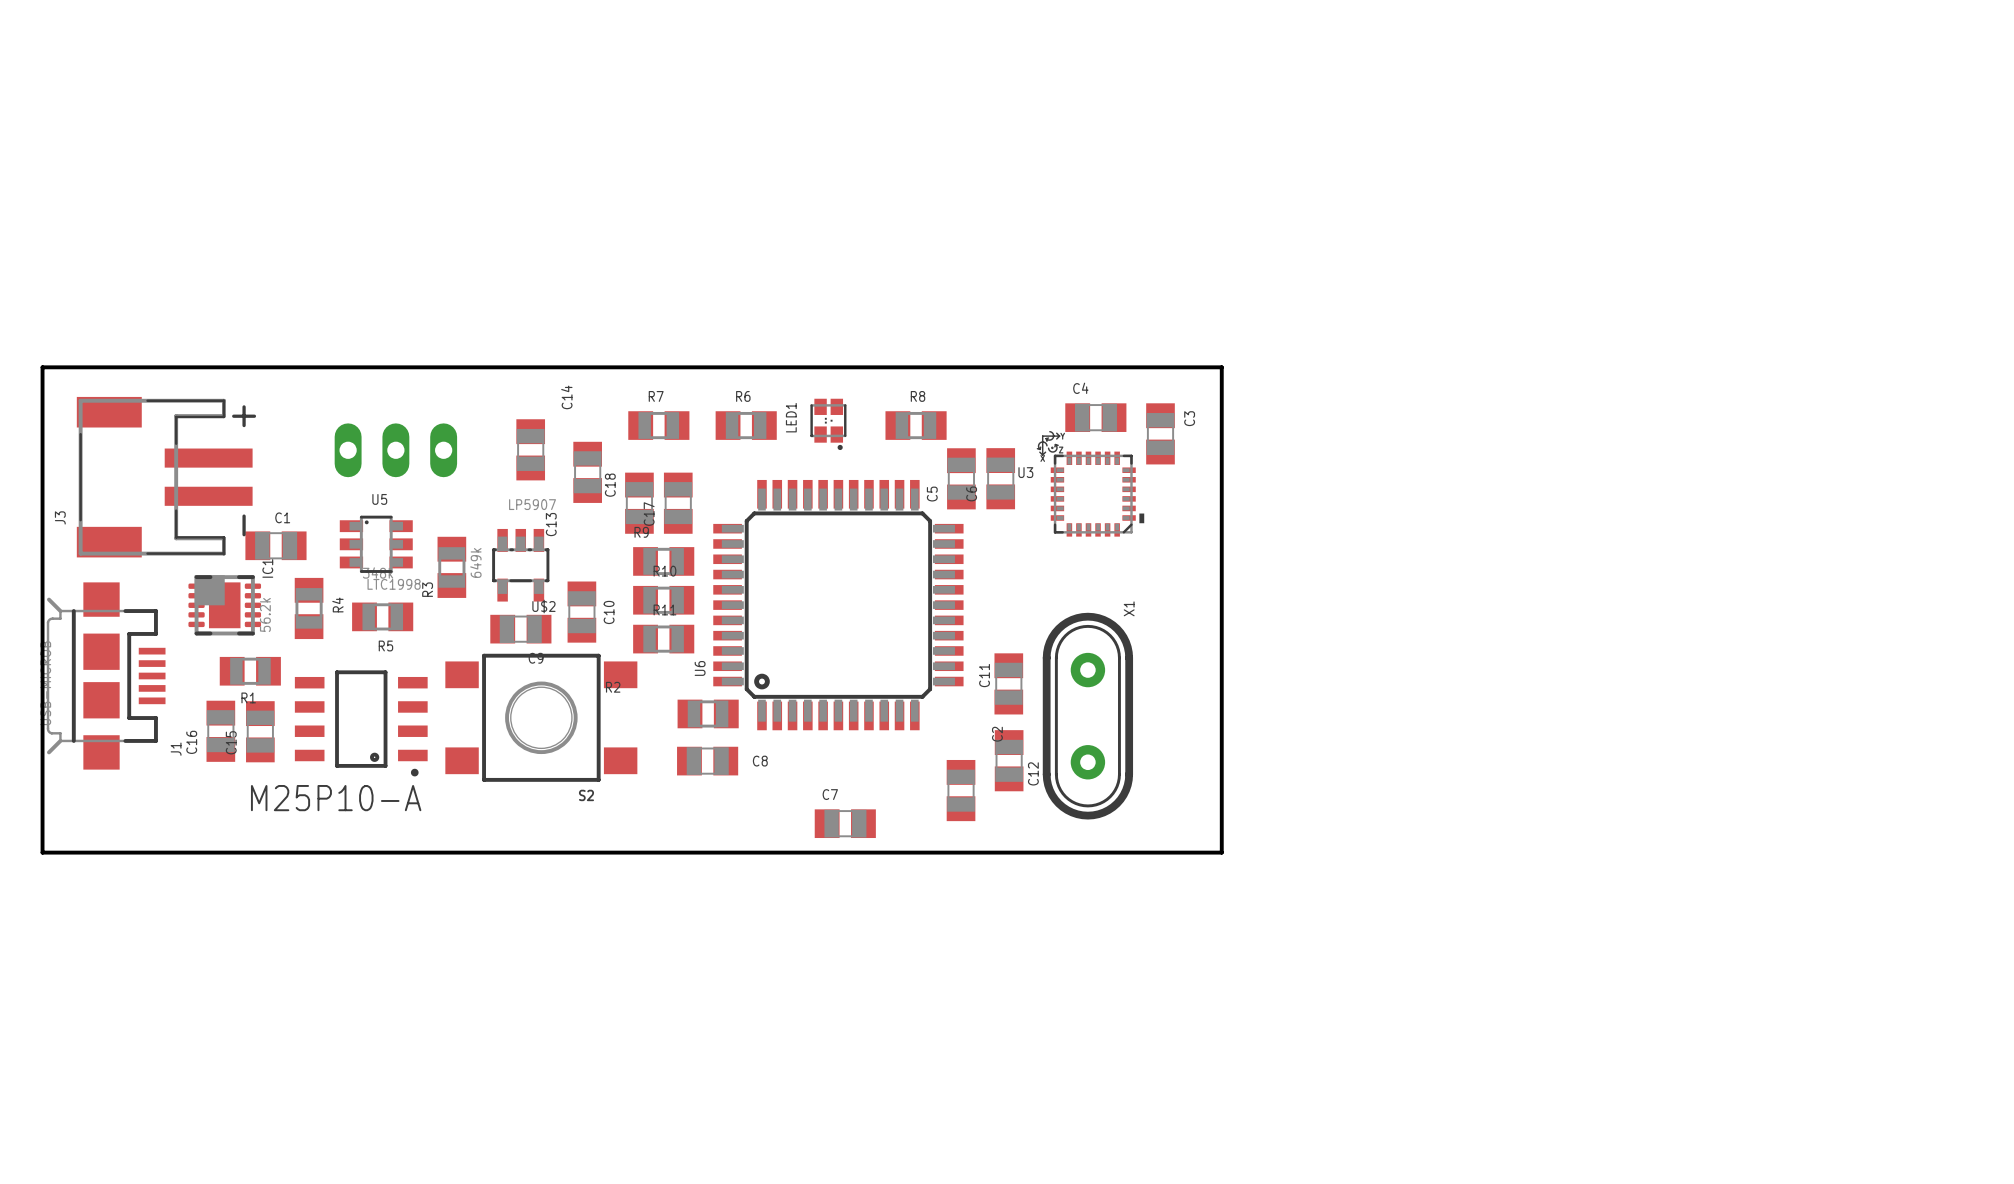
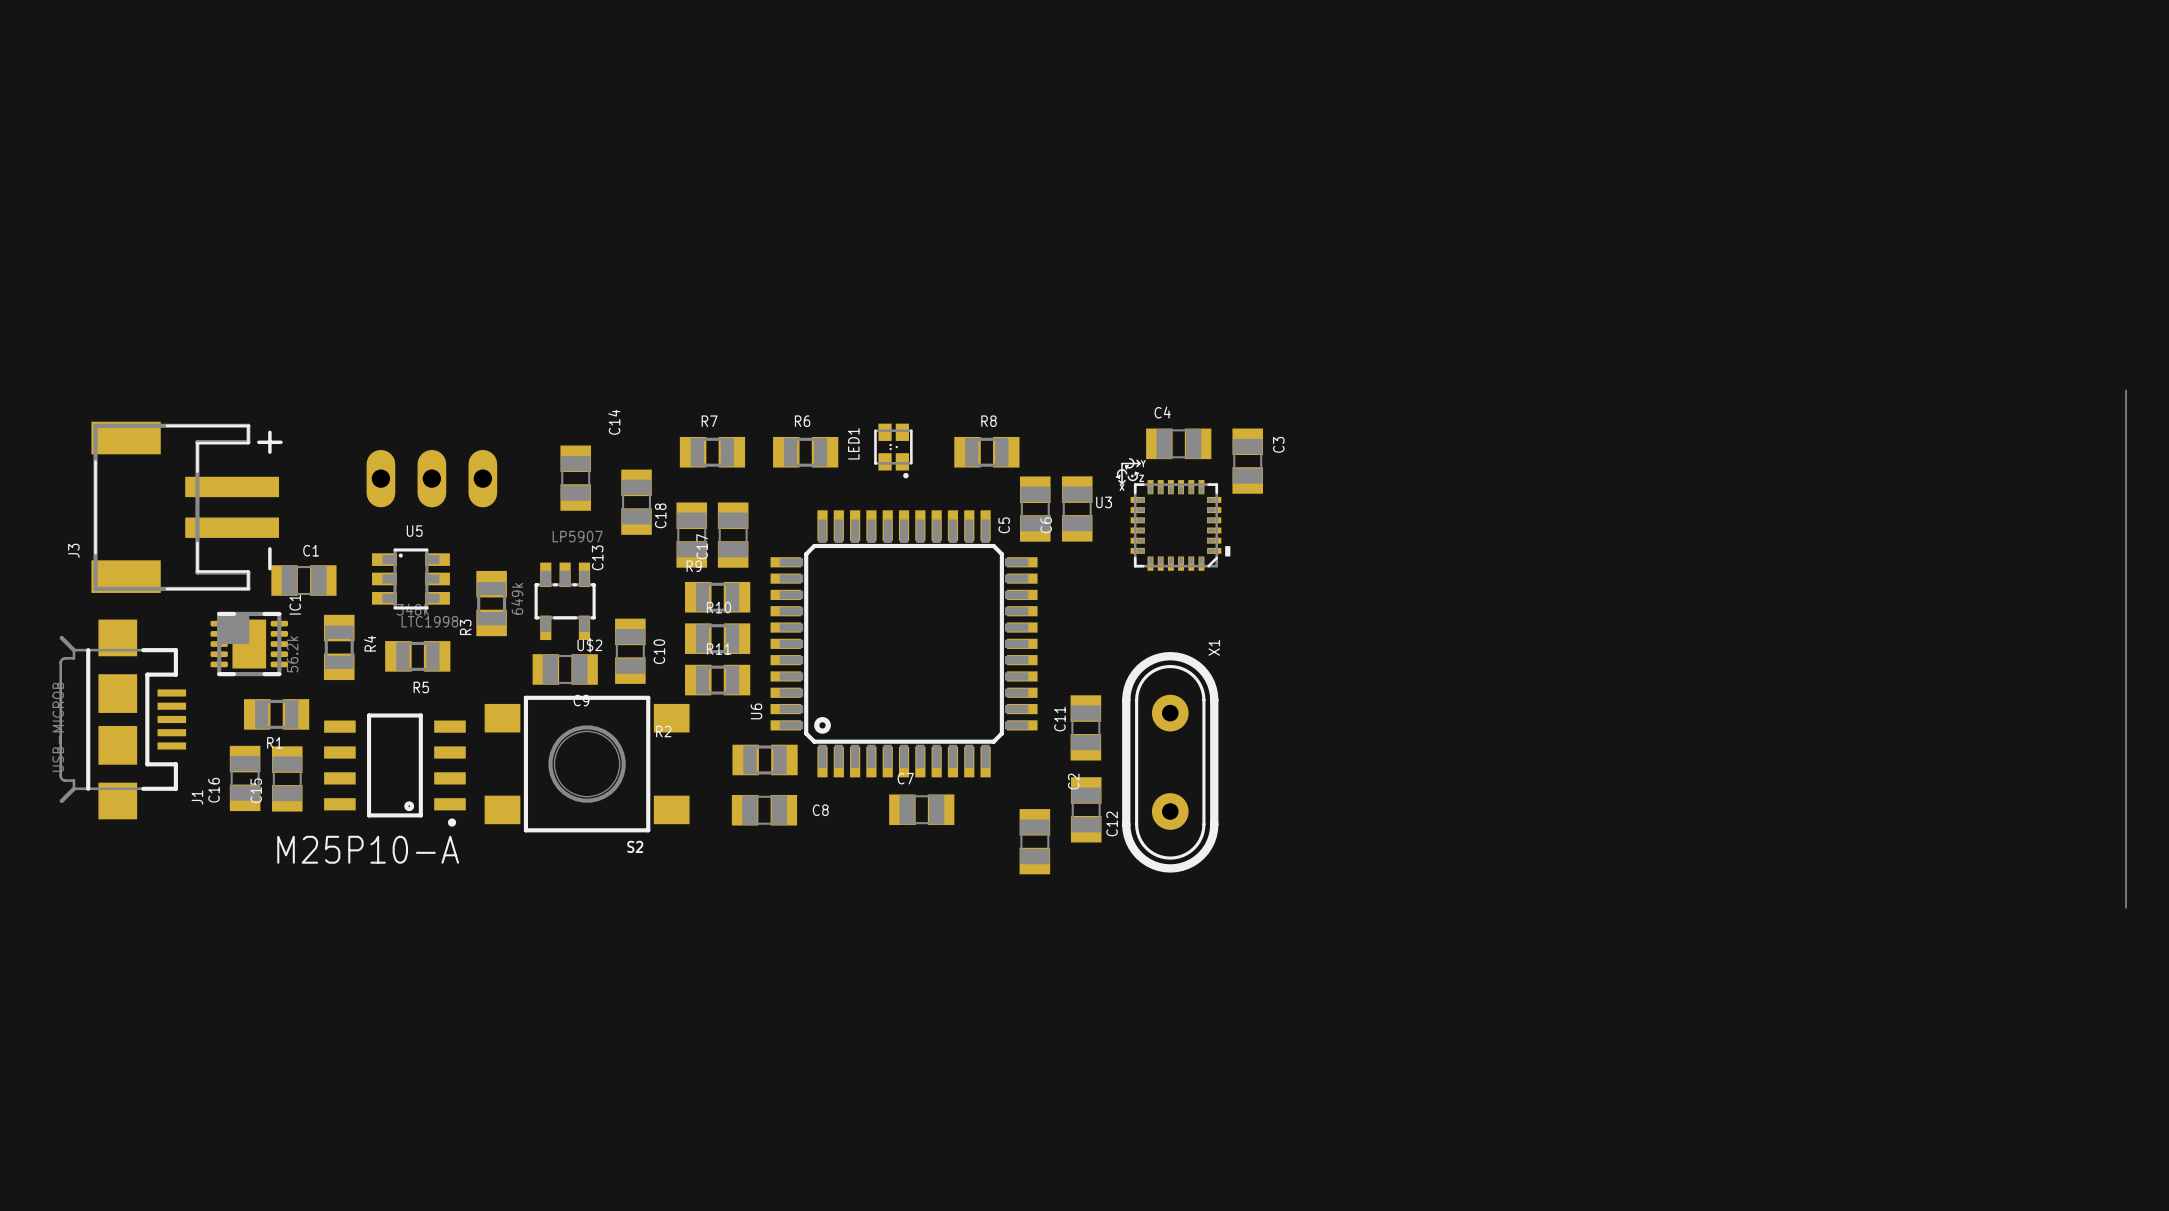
board edge: (42, 367) (42, 852) (1221, 852) (1221, 367) (42, 367) -> none
board edge: none -> (2126, 390) (2126, 907)
C7 position: (845, 823) -> (921, 809)

